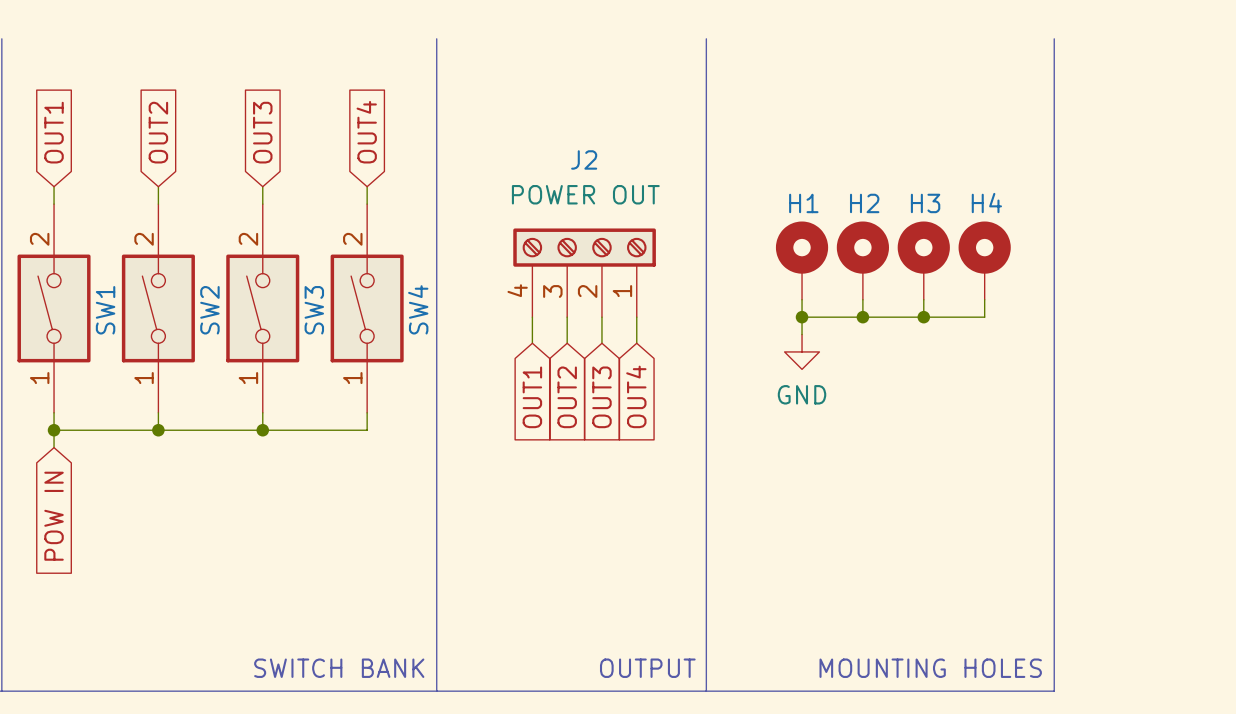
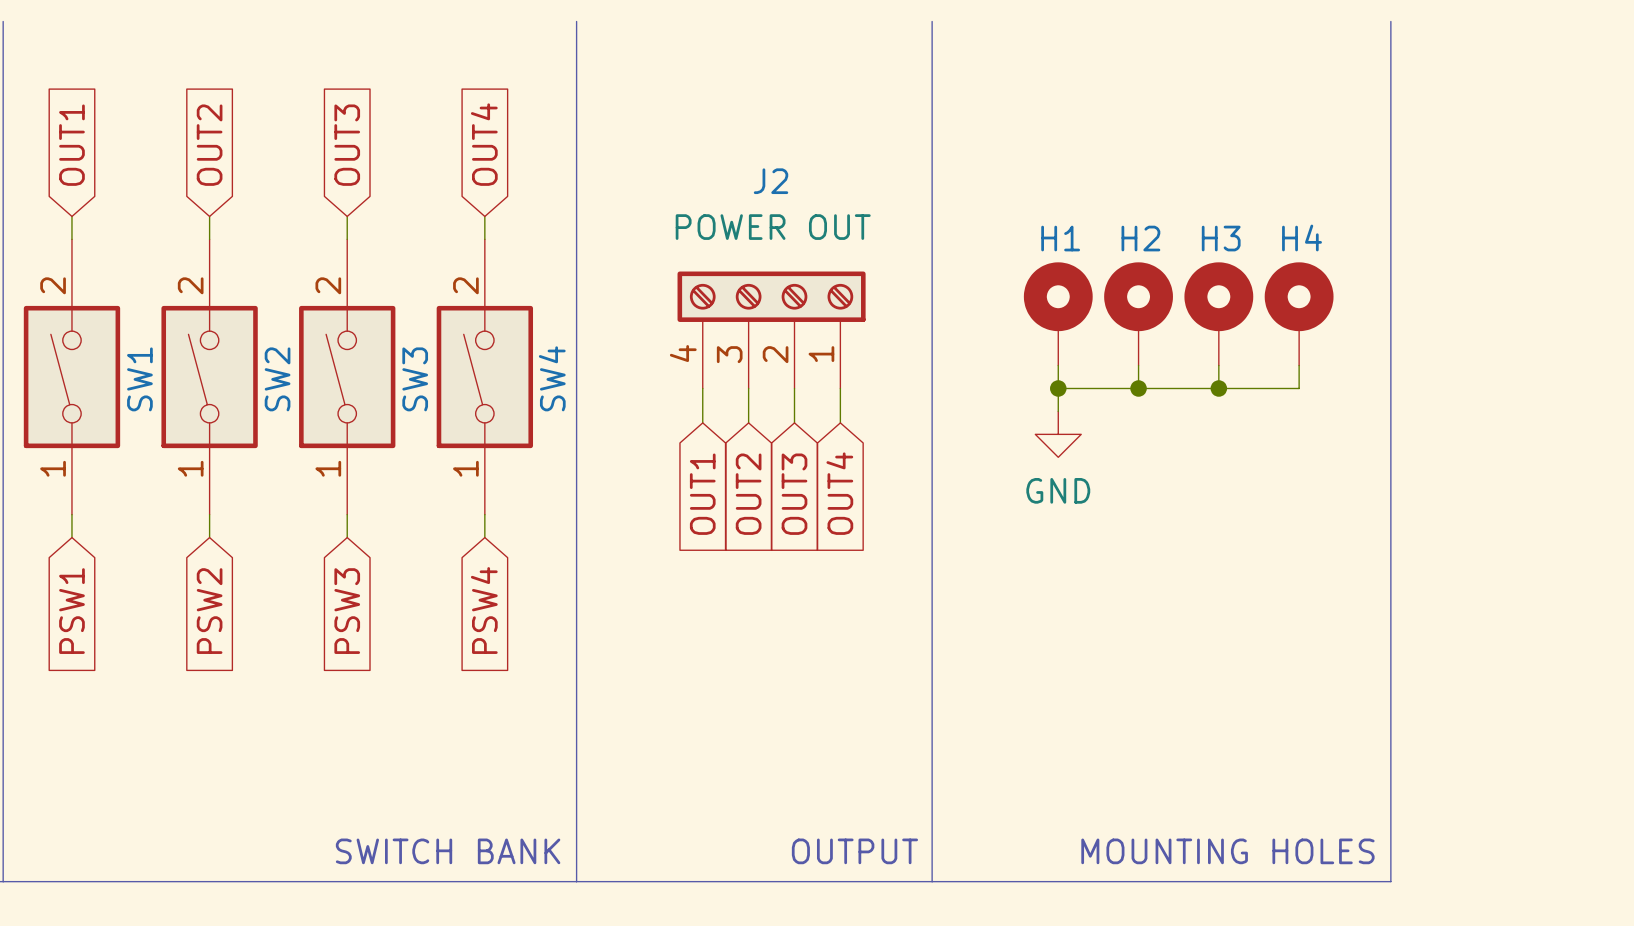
junction: (54, 430) -> none
junction: (158, 430) -> none
junction: (262, 430) -> none
wire: (367, 430) (54, 430) (54, 447) -> none
global label: none -> PSW1 (71, 611)
global label: none -> PSW2 (209, 611)
global label: none -> PSW3 (347, 611)
global label: none -> PSW4 (484, 610)
global label: POW IN (54, 516) -> none

